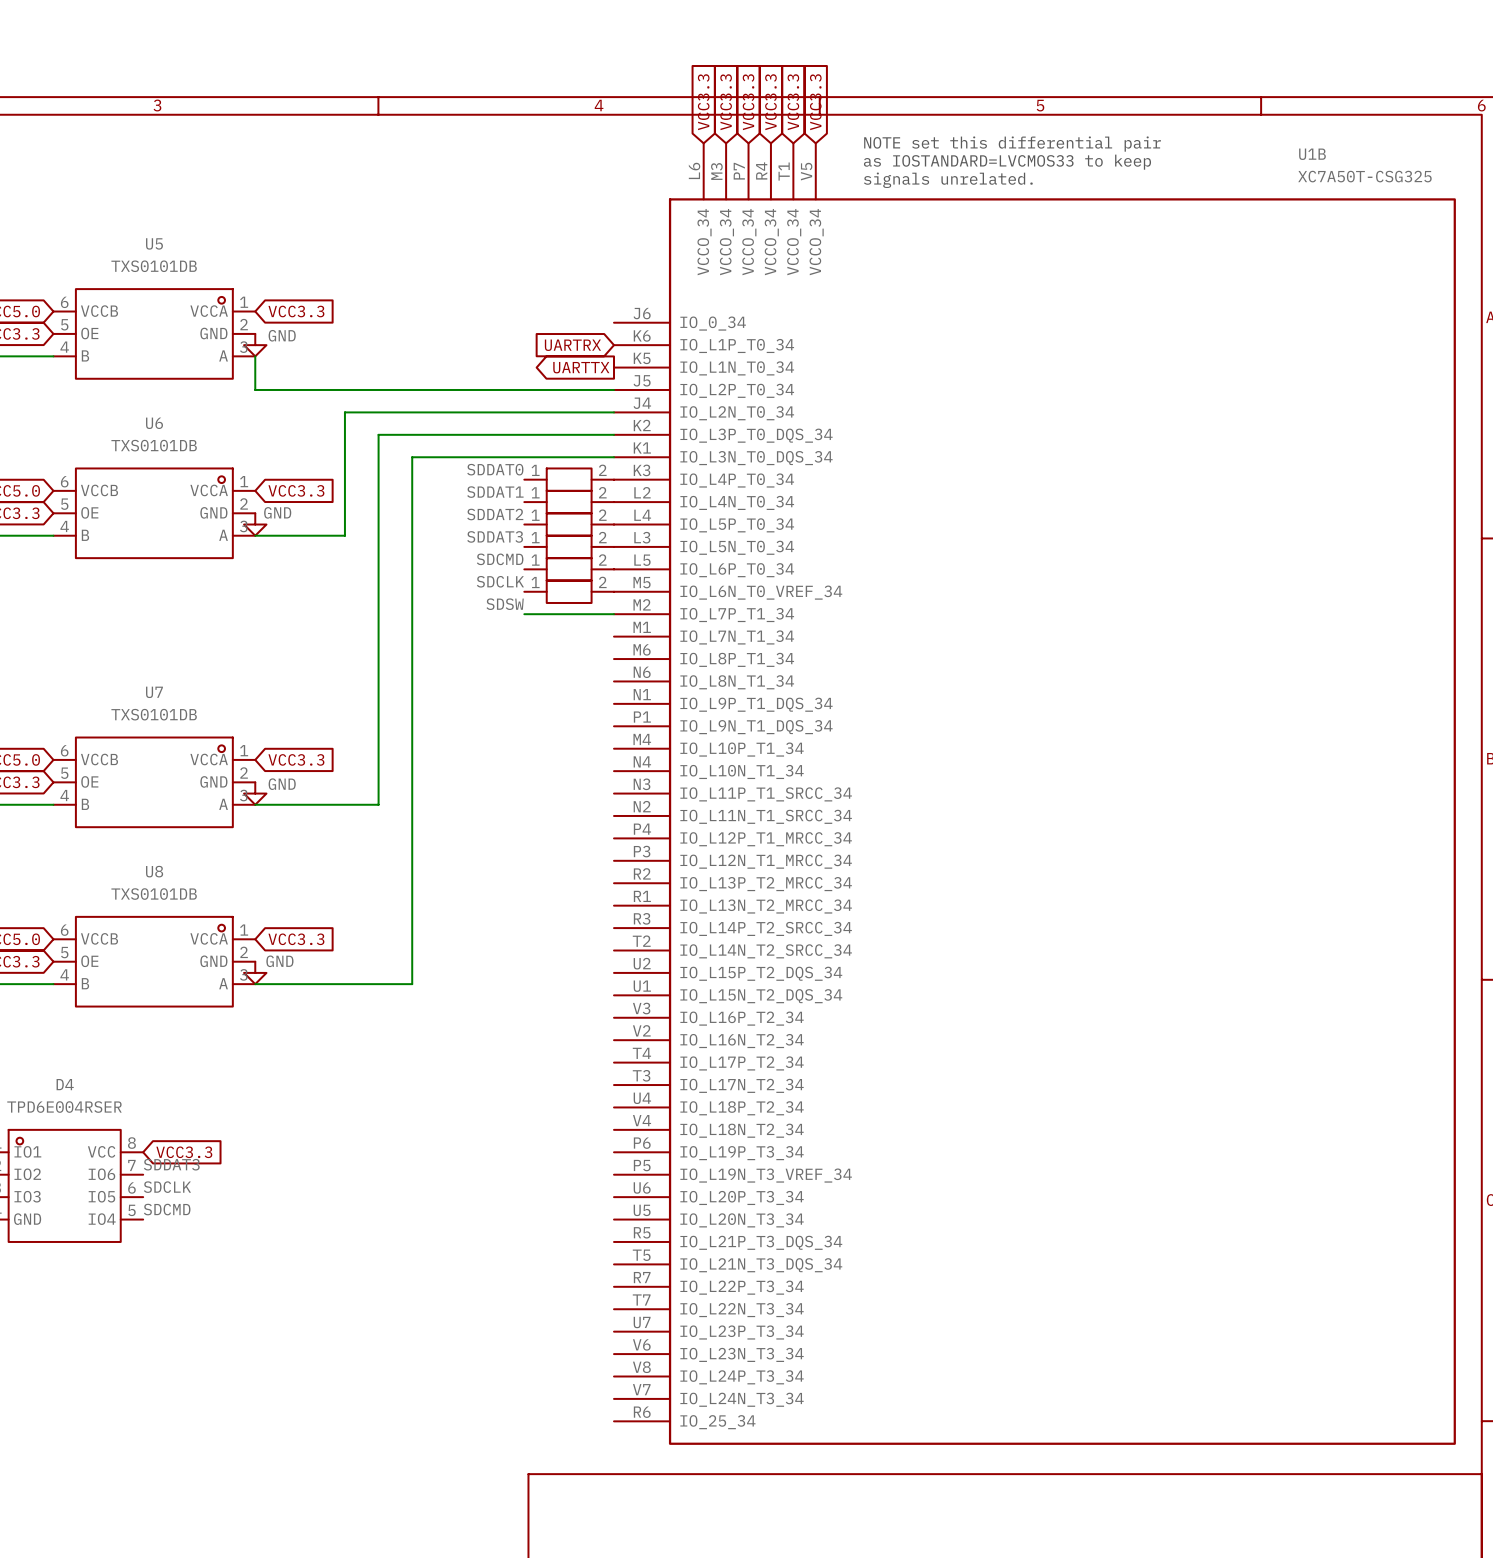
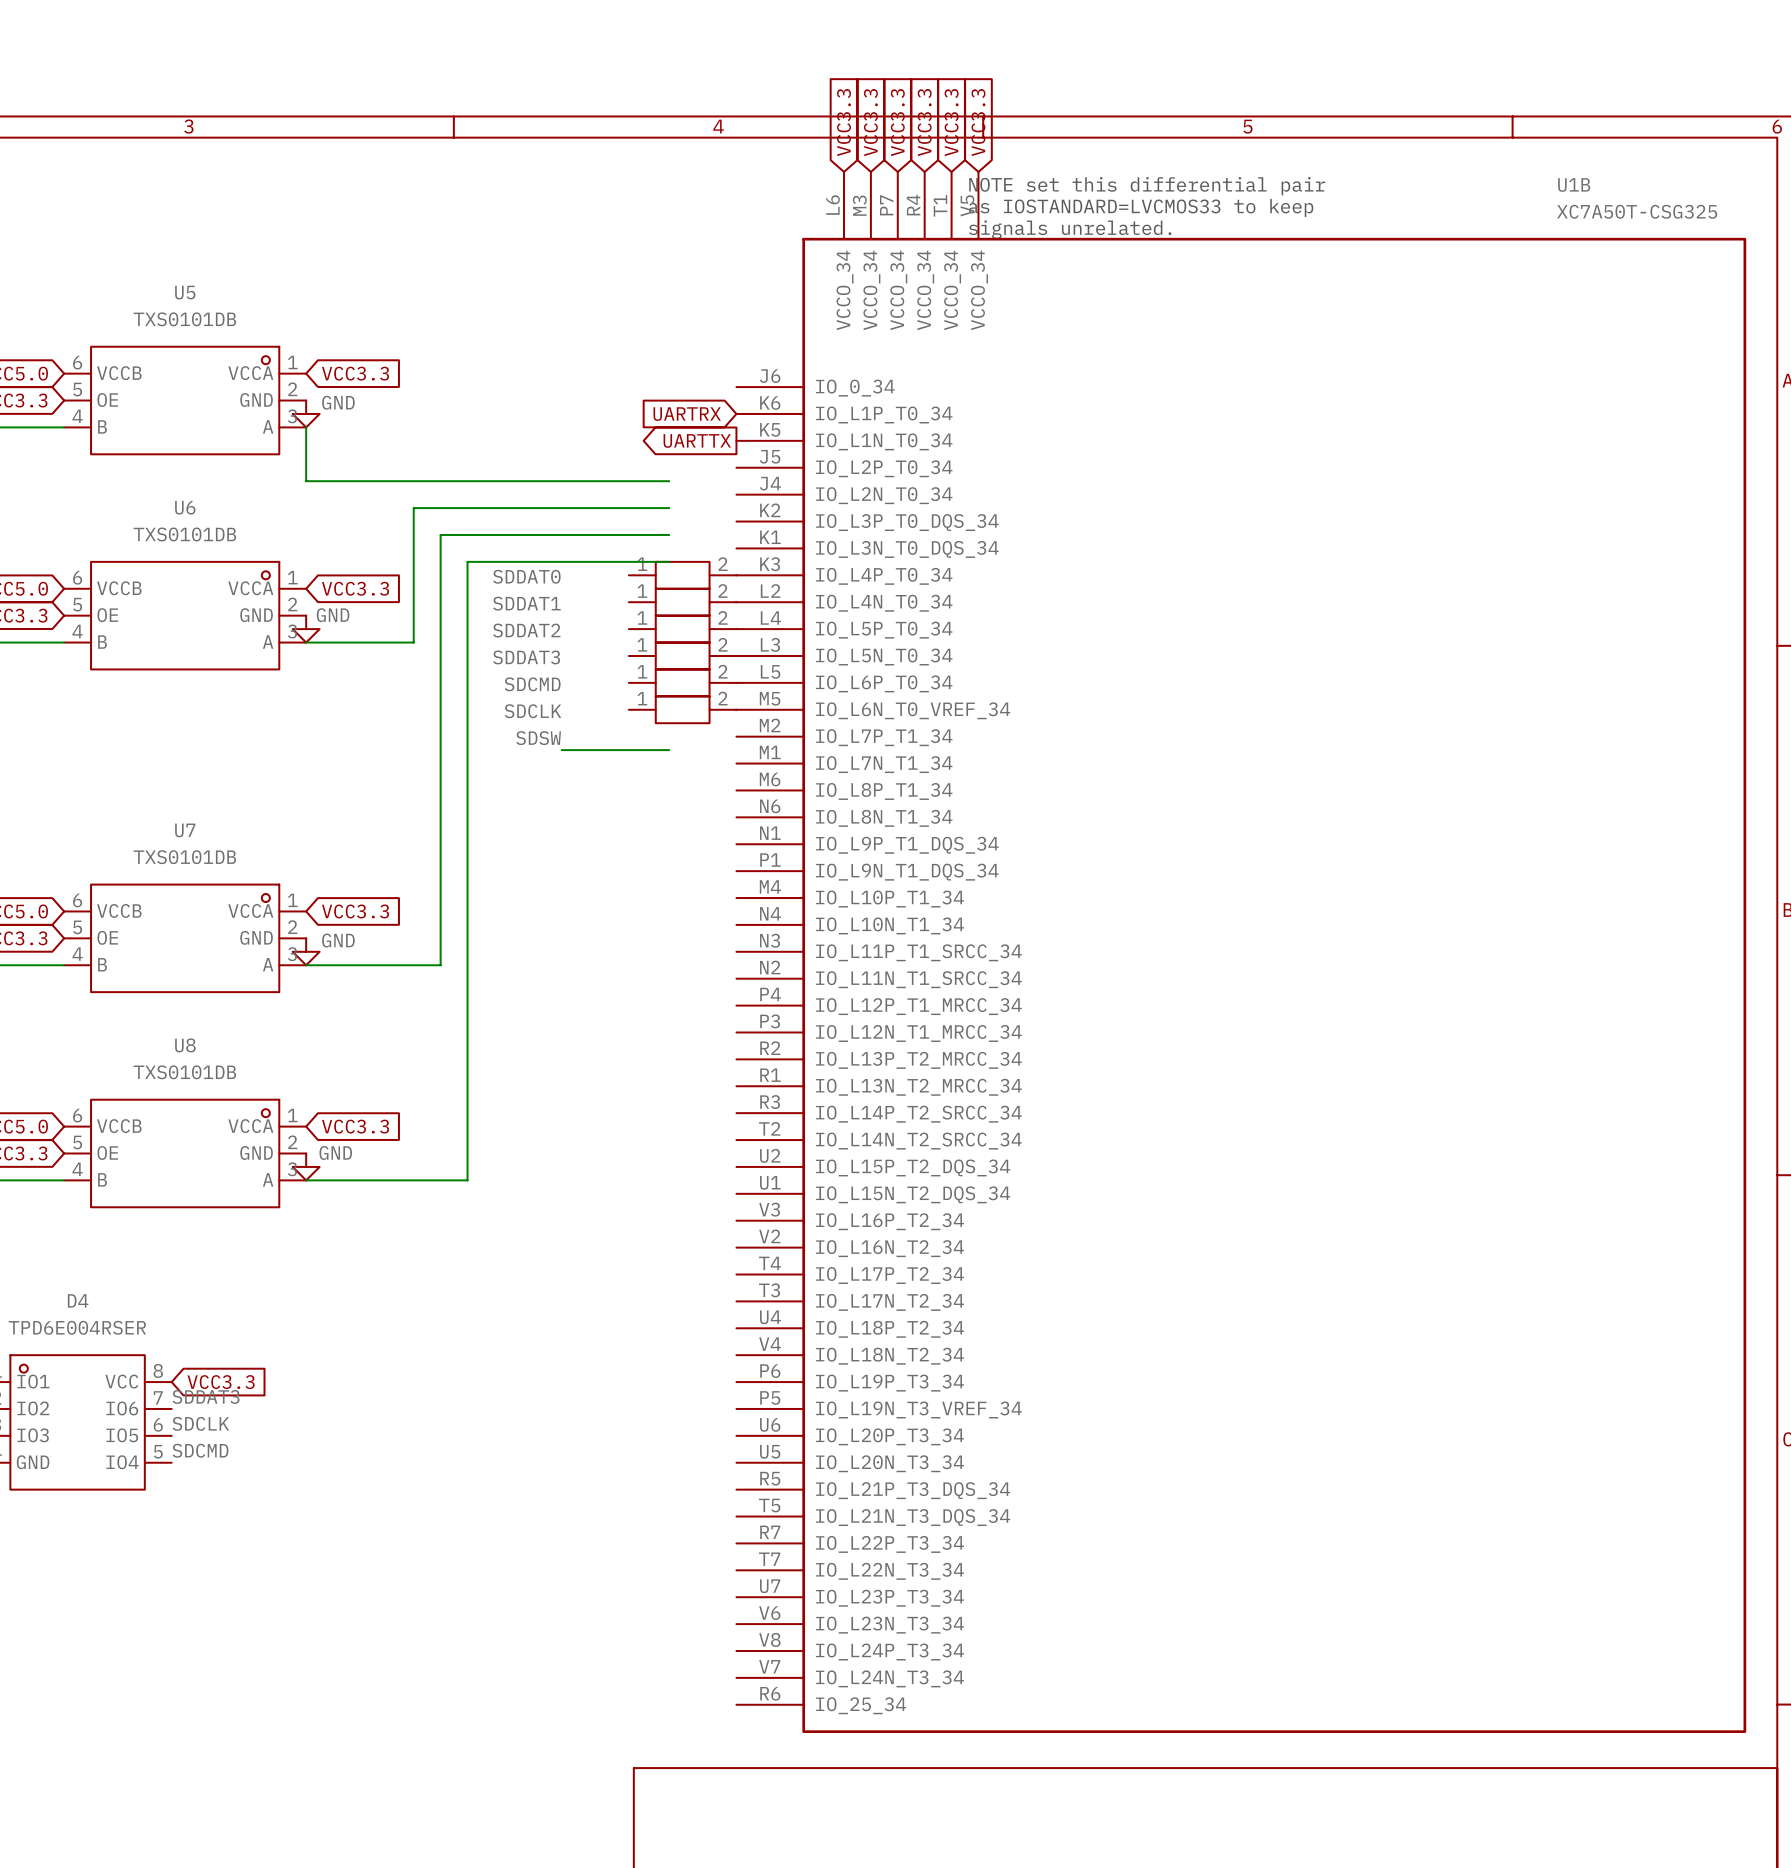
text position: NOTE set this differential pair (1012, 144) -> NOTE set this differential pair (1147, 186)
text position: as IOSTANDARD=LVCMOS33 to keep (1007, 162) -> as IOSTANDARD=LVCMOS33 to keep (1141, 207)
text position: signals unrelated. (948, 180) -> signals unrelated. (1070, 229)
wire: (255, 389) (614, 389) -> (306, 467) (306, 481) (669, 481)
wire: (614, 412) (344, 412) (344, 423) -> (669, 508) (413, 508)
wire: (614, 434) (378, 434) (378, 804) (367, 804) -> (669, 534) (440, 534) (440, 965)
wire: (614, 457) (412, 457) (412, 984) (389, 984) -> (669, 561) (467, 561) (467, 1180)
label position: SDDAT0 (495, 469) -> SDDAT0 (526, 576)
label position: SDDAT1 (495, 492) -> SDDAT1 (526, 603)
label position: SDDAT2 (495, 514) -> SDDAT2 (526, 630)
label position: SDDAT3 (495, 536) -> SDDAT3 (526, 657)
label position: SDCMD (500, 559) -> SDCMD (532, 684)
label position: SDCLK (500, 581) -> SDCLK (532, 711)
label position: SDSW (505, 604) -> SDSW (538, 738)
wire: (524, 614) (614, 614) -> (561, 750) (669, 750)

